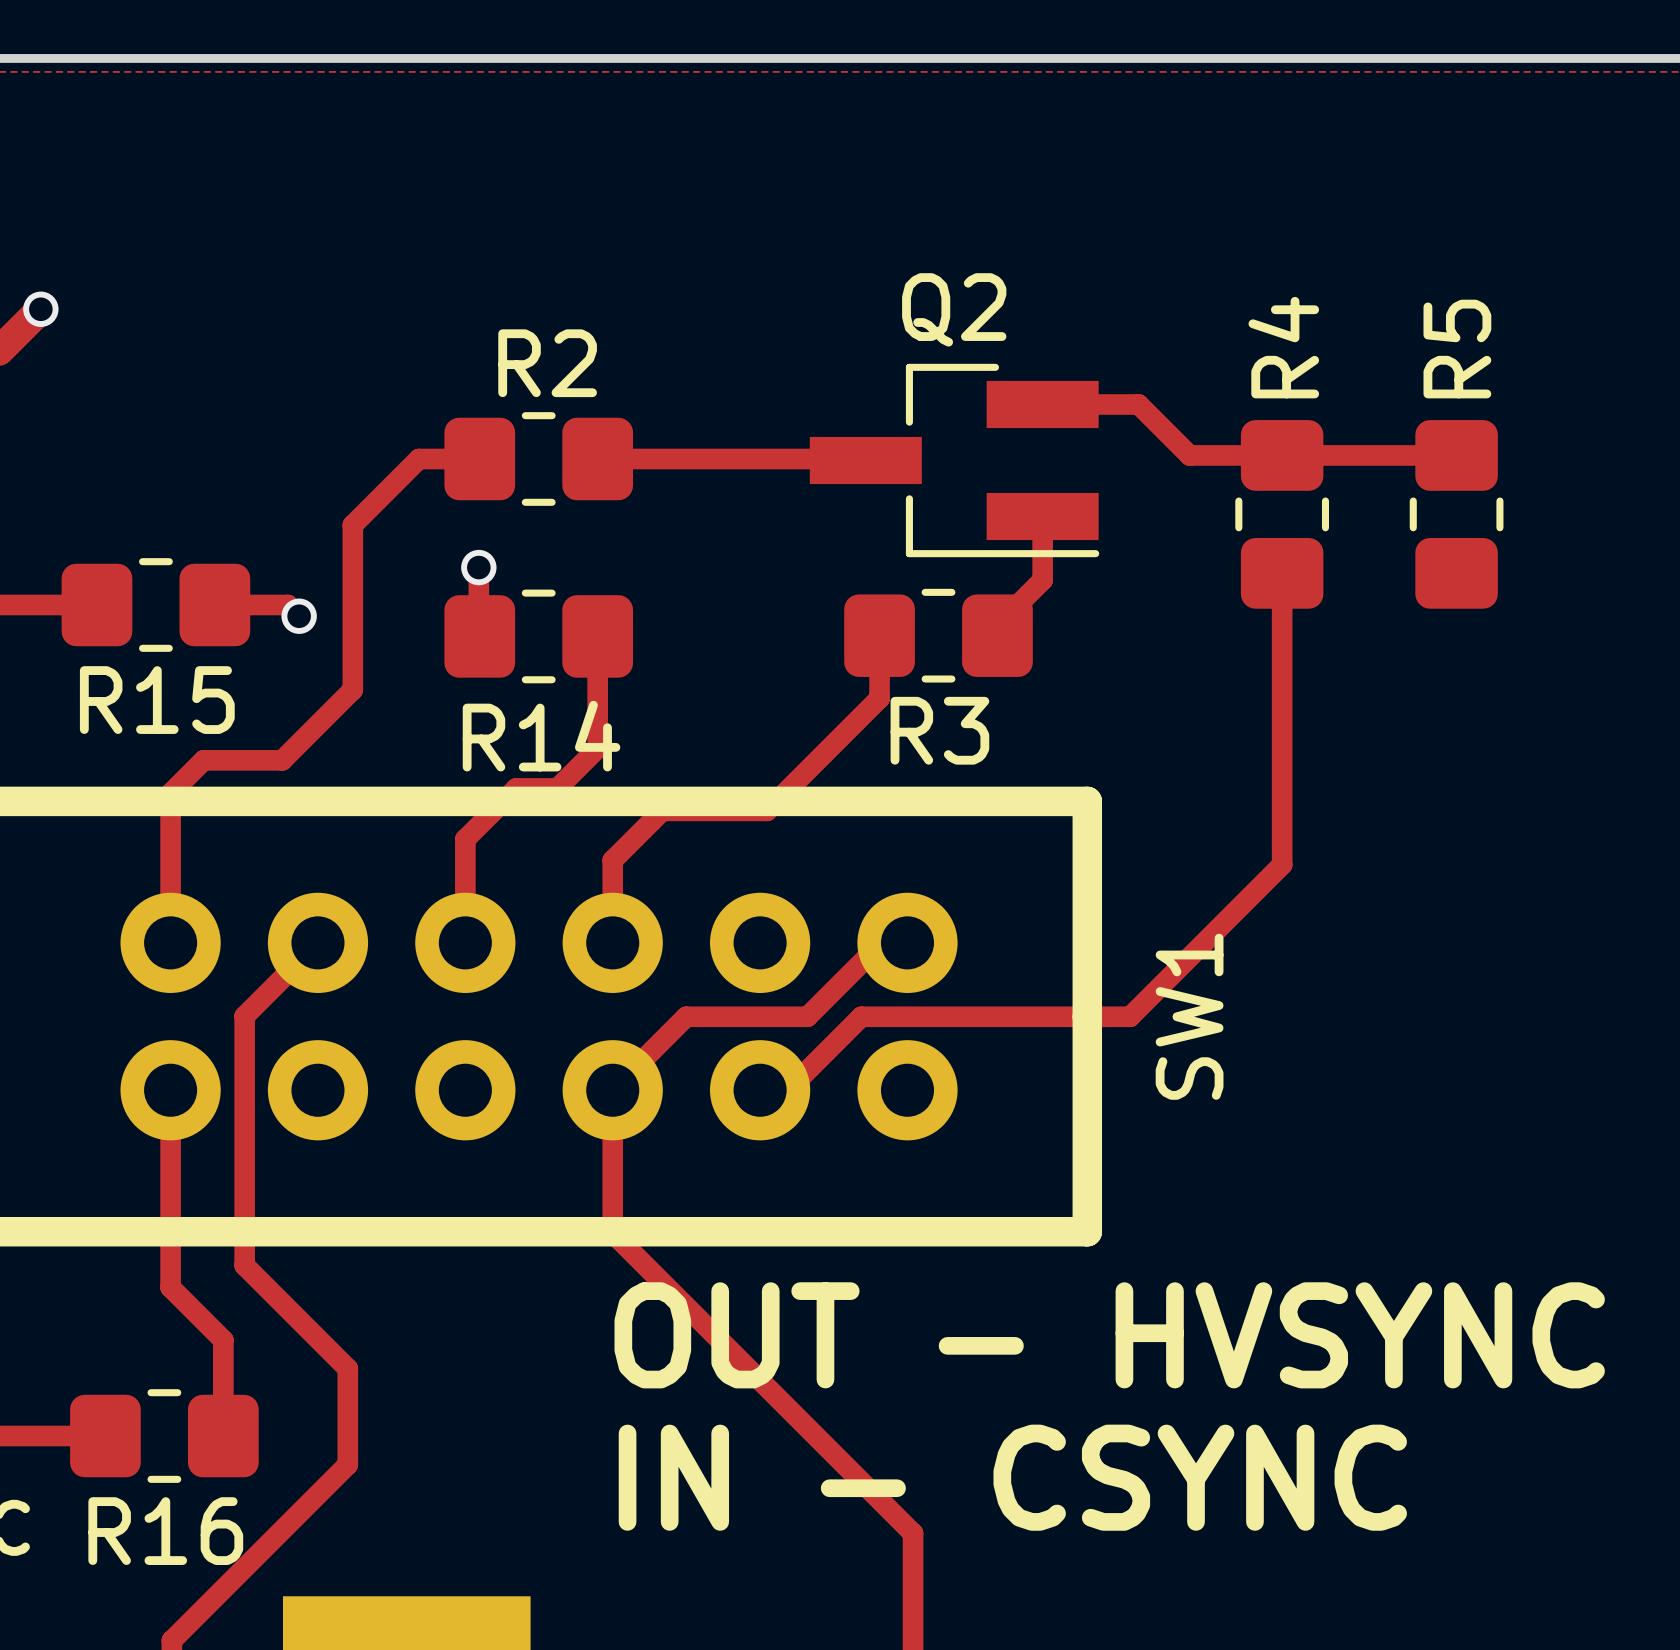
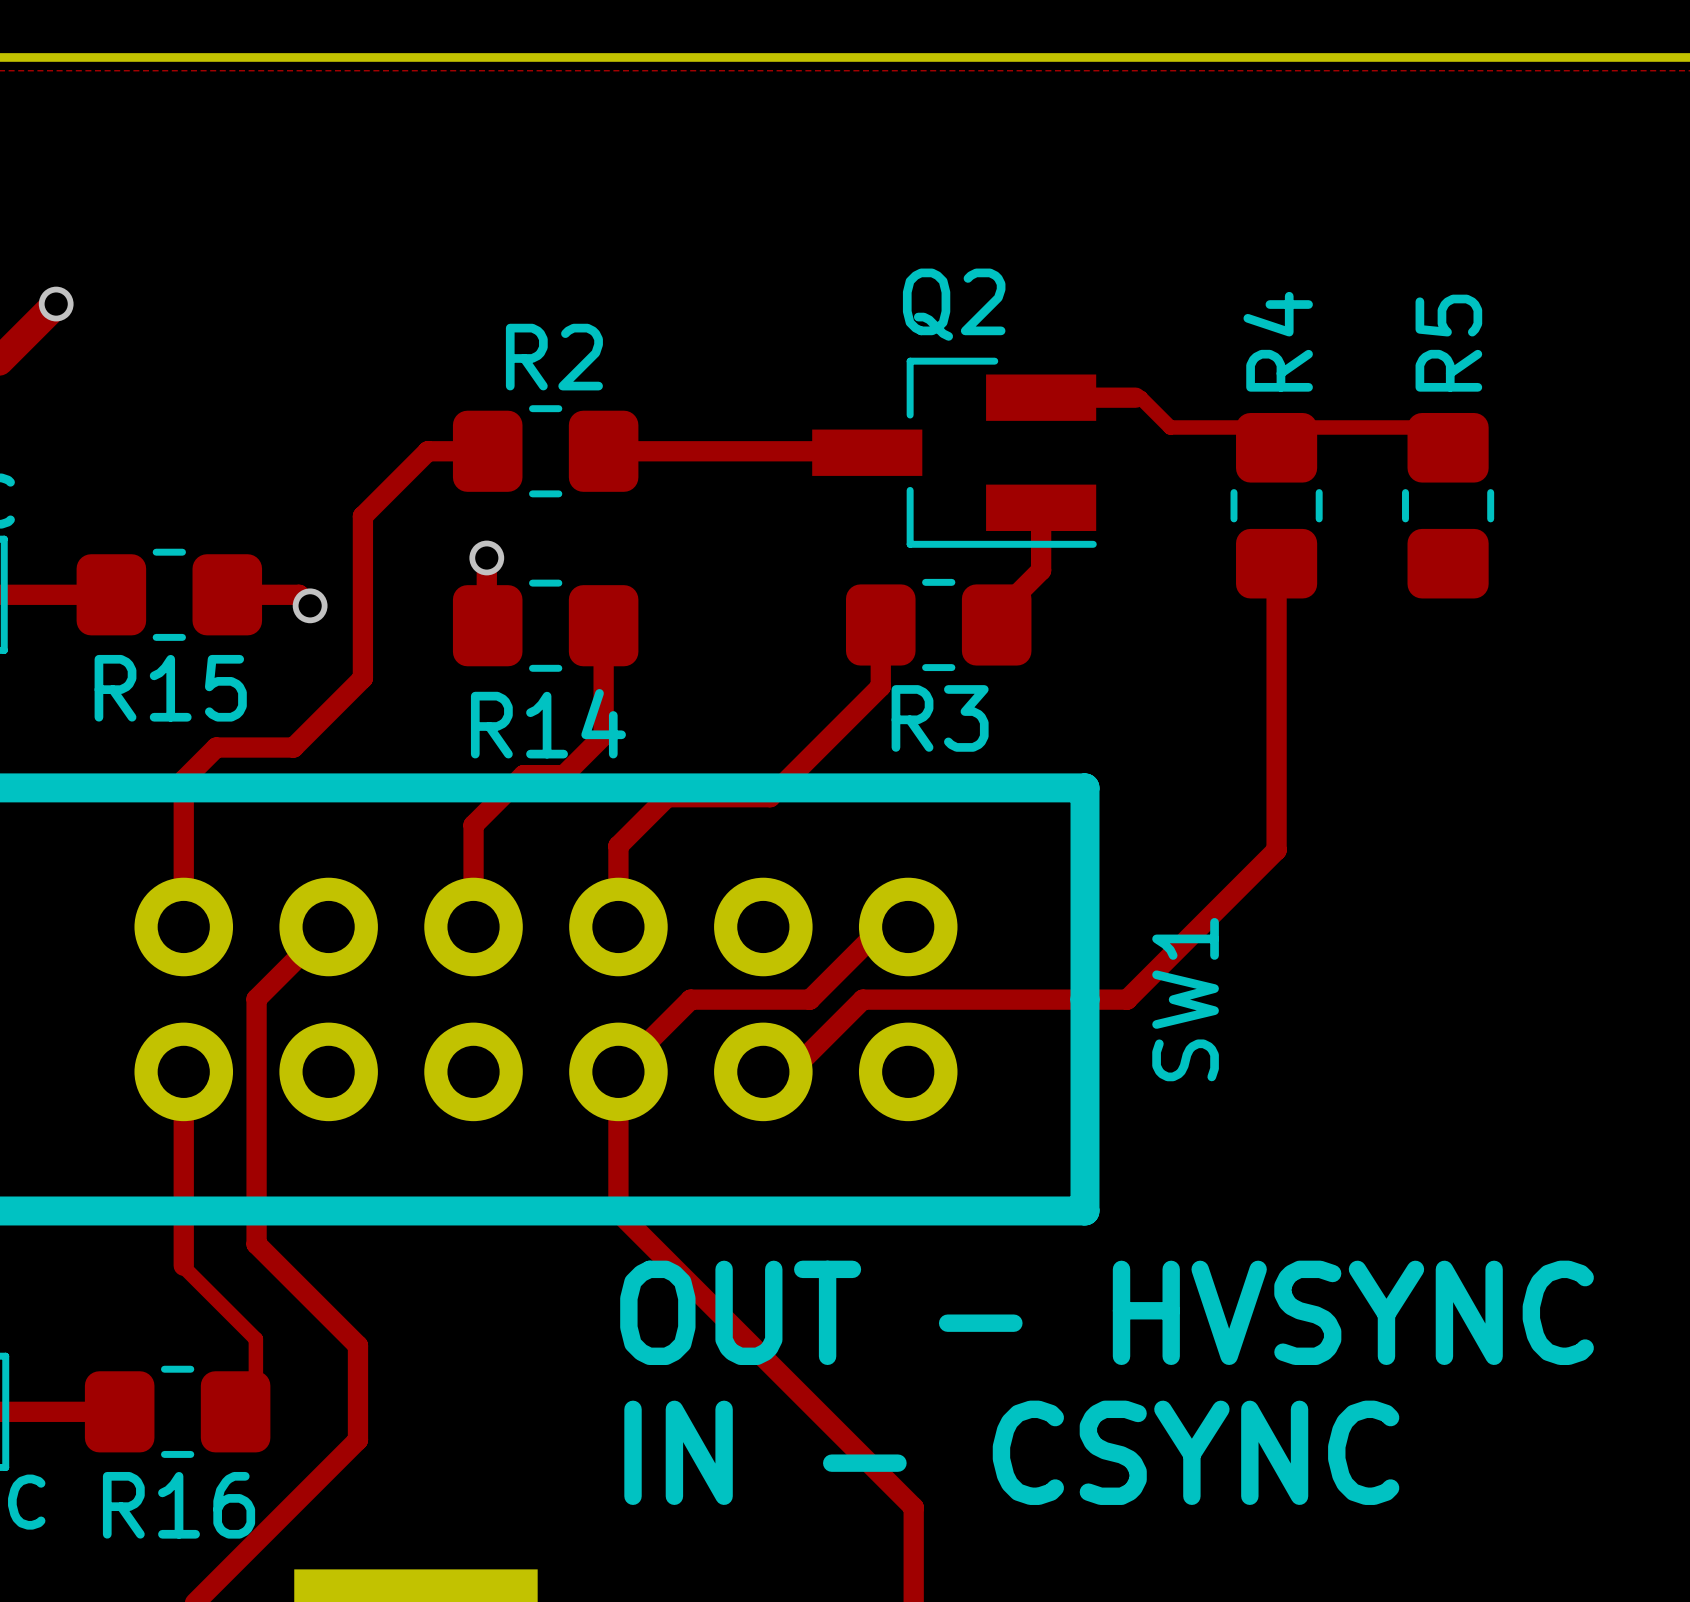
track: (1138, 404) (1189, 455) (1456, 455) -> (1135, 397) (1140, 397) (1170, 427) (1448, 427)
track: (170, 1287) (223, 1340) (223, 1436) -> (183, 1265) (255, 1339) (255, 1411)

